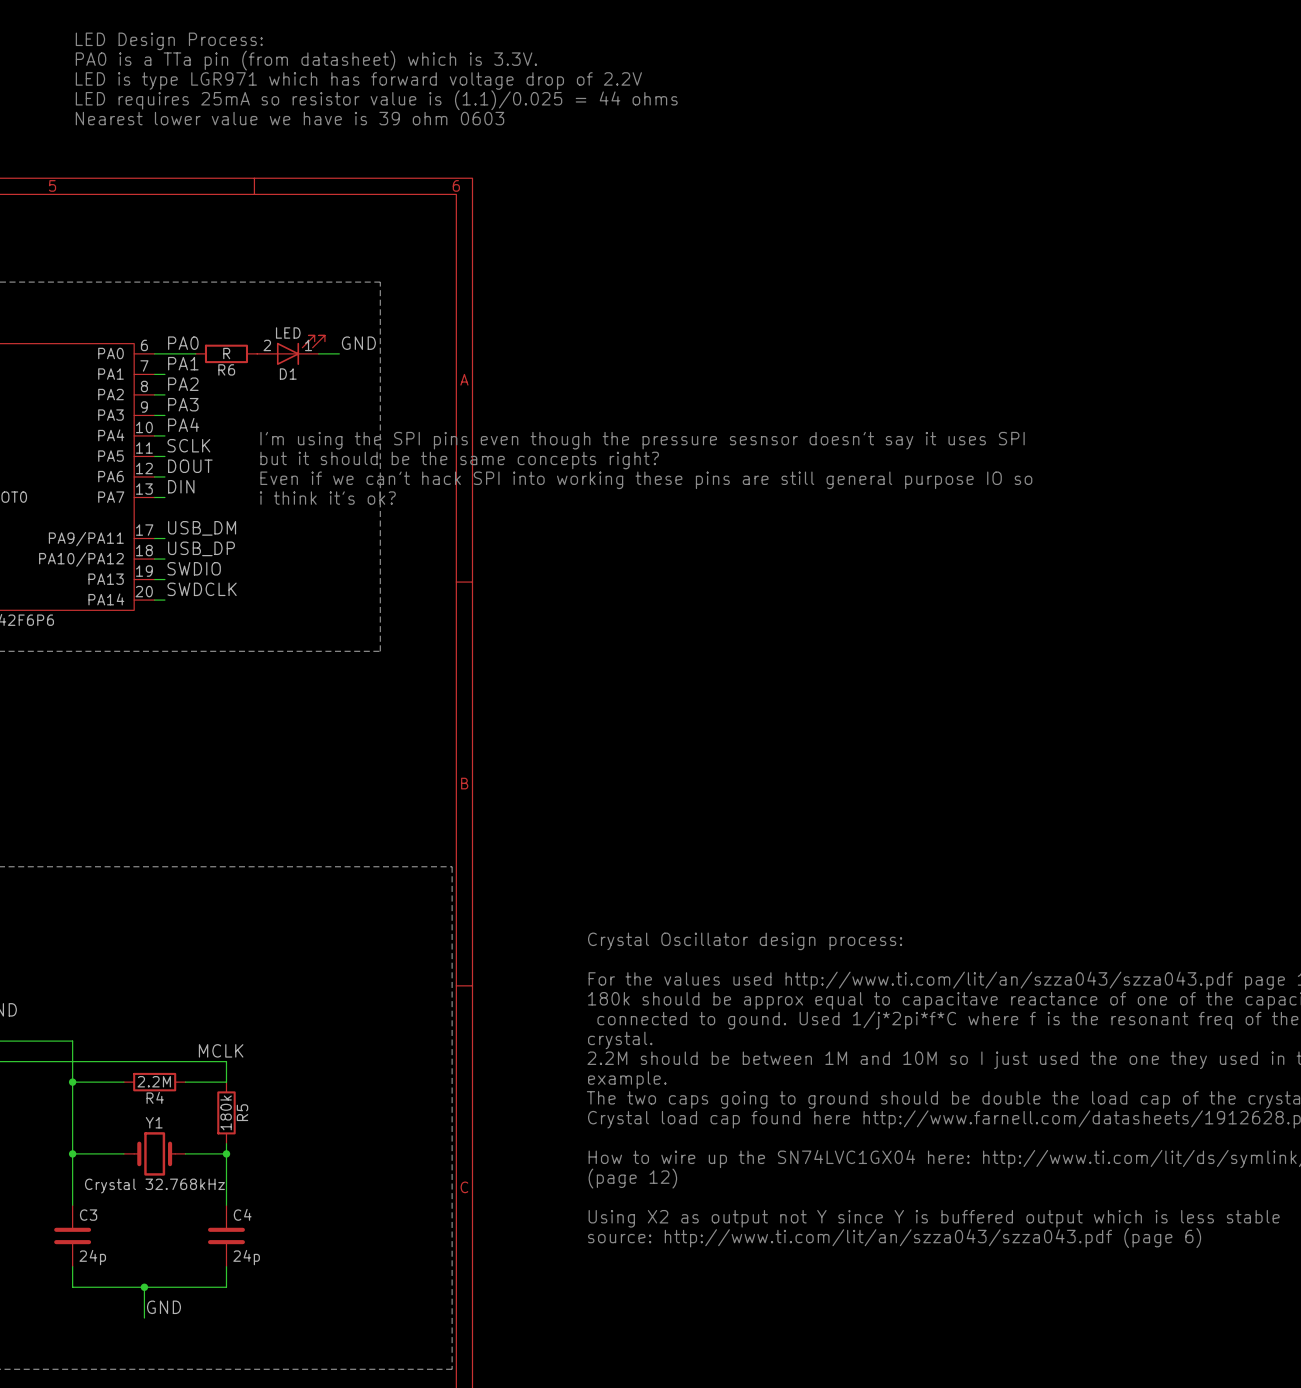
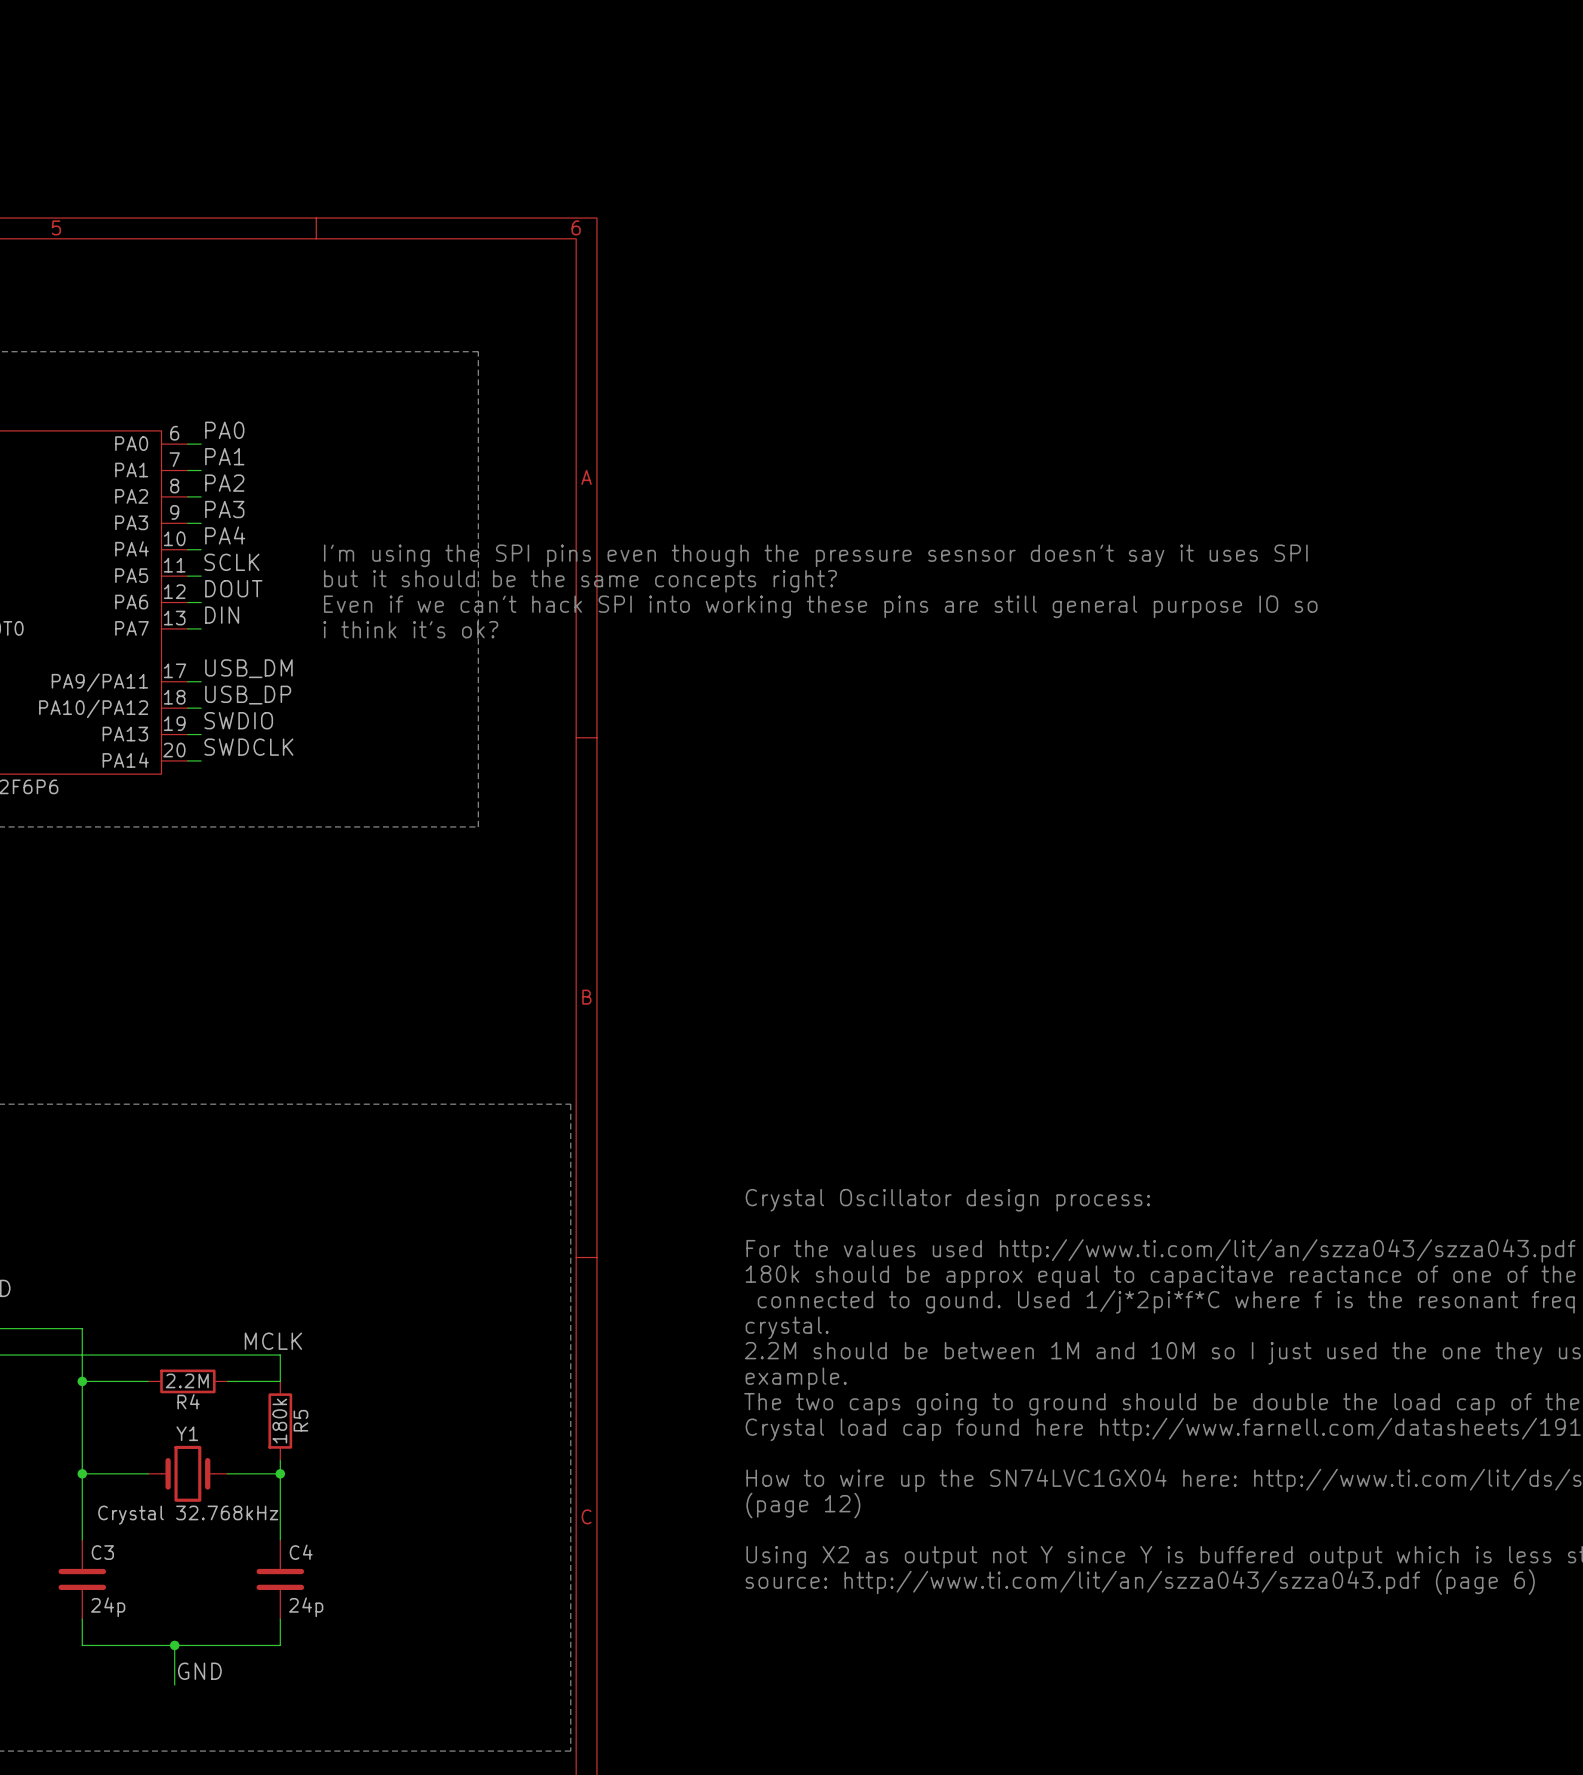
text: LED Design Process: (169, 41) -> none
text: PA0 is a TTa pin (from datasheet) which is 3.3V. (306, 60) -> none
text: LED is type LGR971 which has forward voltage drop of 2.2V (358, 80) -> none
text: LED requires 25mA so resistor value is (1.1)/0.025 = 44 ohms (376, 100) -> none
text: Nearest lower value we have is 39 ohm 0603 (290, 118) -> none
label: GND (358, 343) -> none
D1: LED (291, 350) -> none
wire: (164, 353) (195, 353) -> none
R6: R (226, 353) -> none
wire: (318, 353) (339, 353) -> none

